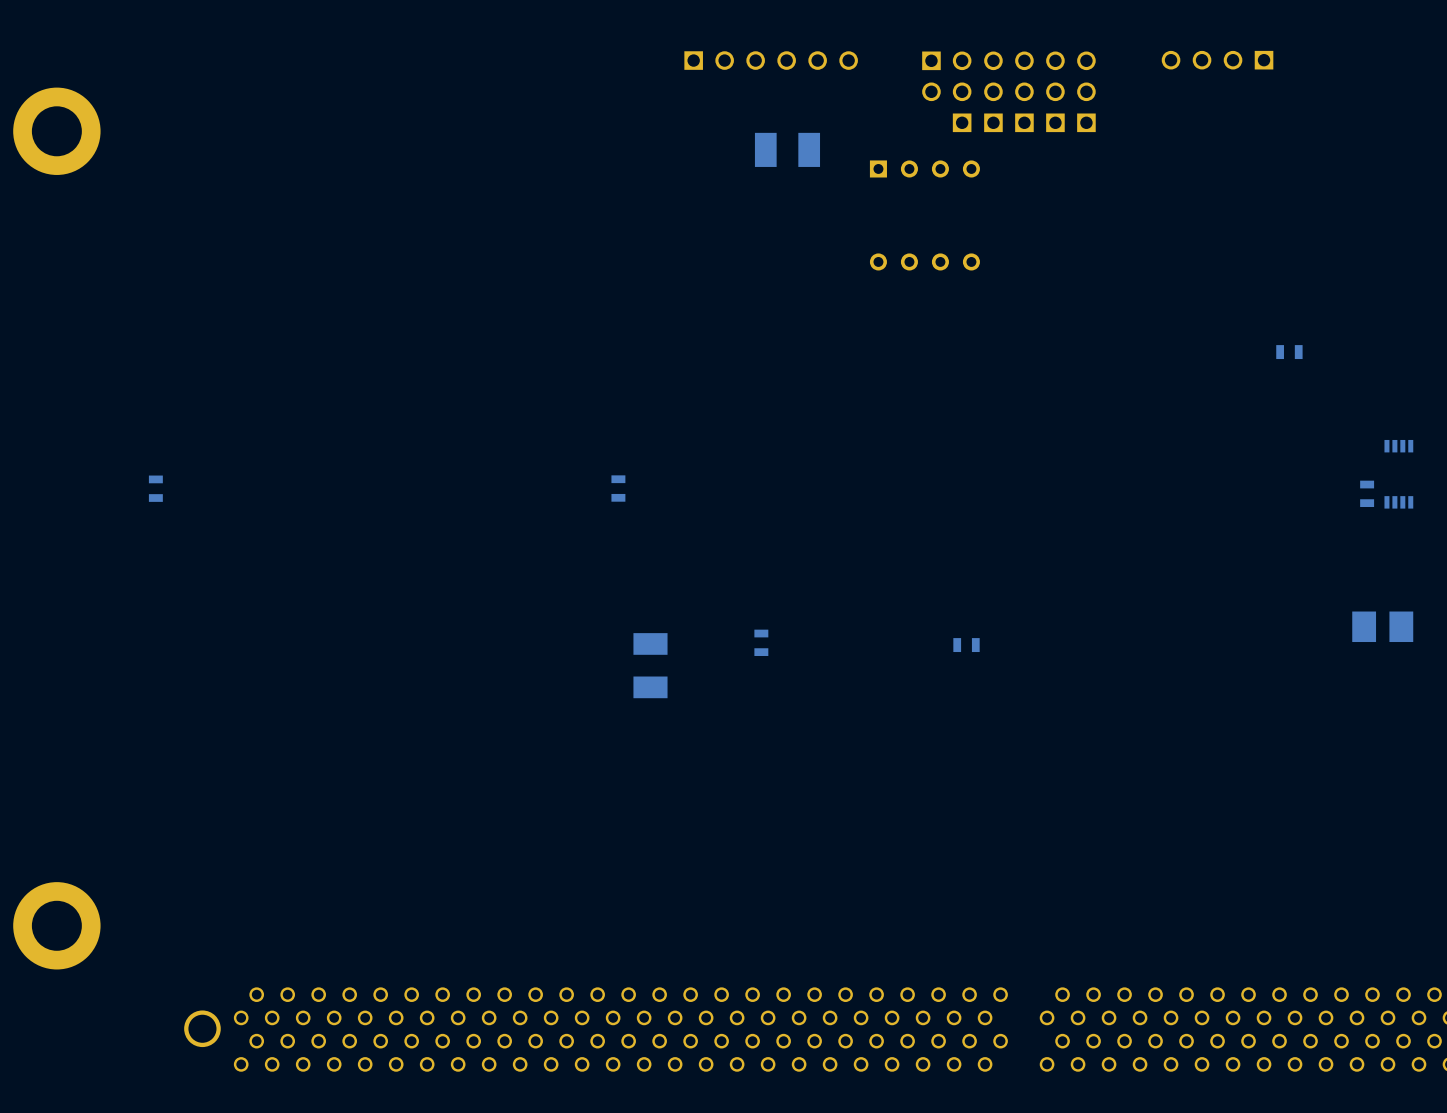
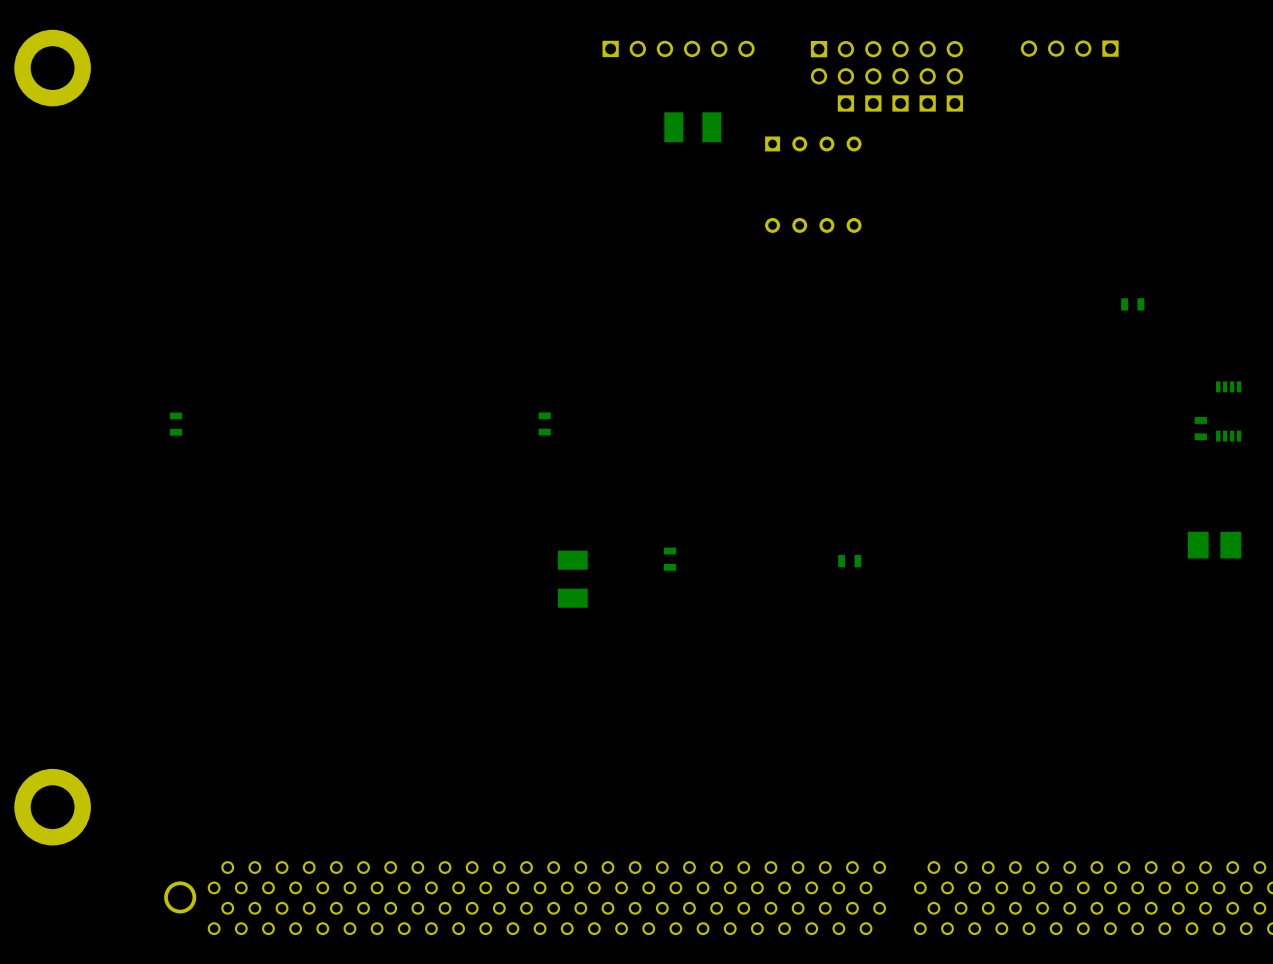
part position: (56, 131) -> (52, 68)
part position: (155, 488) -> (176, 424)

